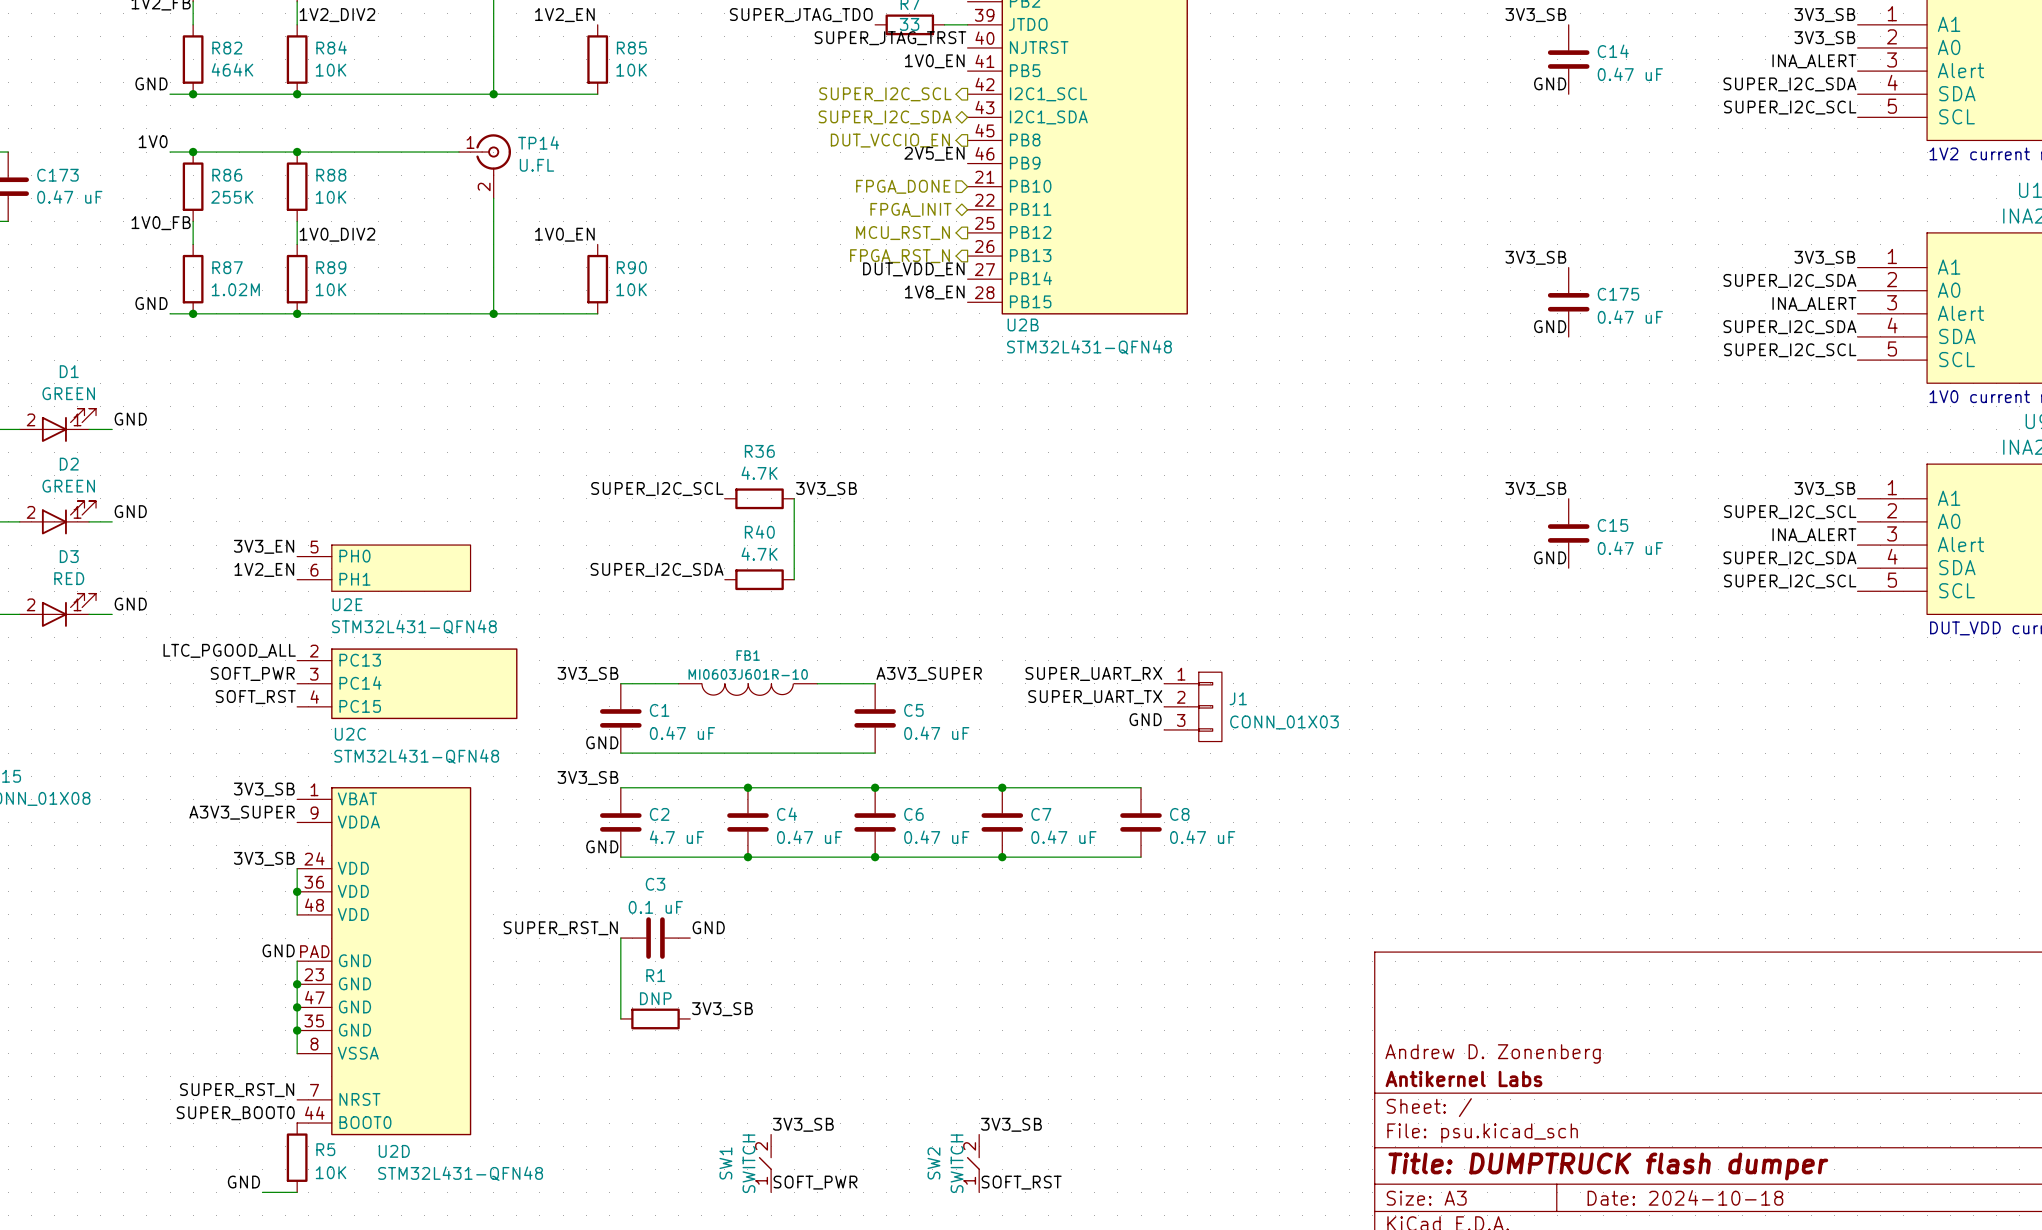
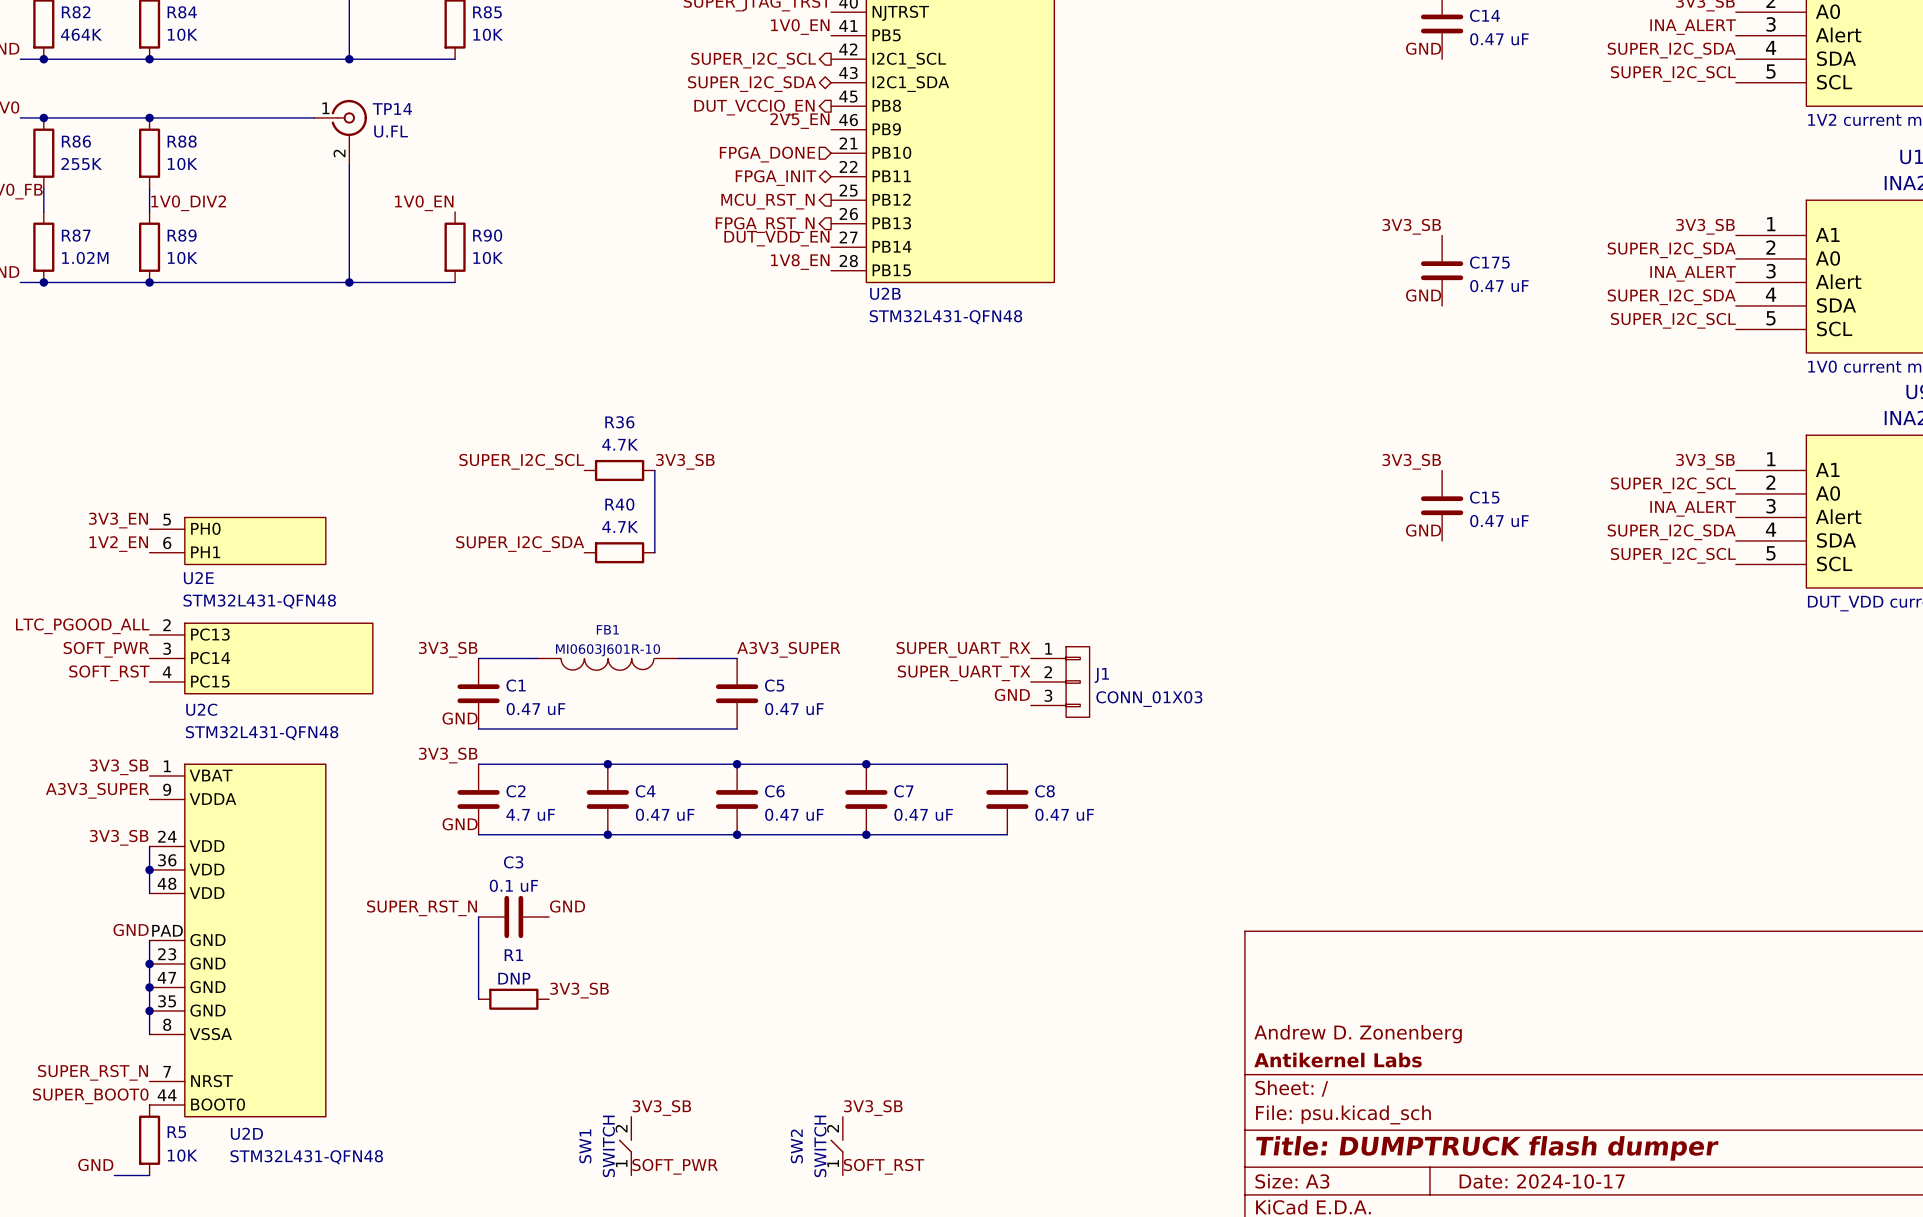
title block: Date: 2024-10-18 (1685, 1197) -> Date: 2024-10-17 (1542, 1181)

